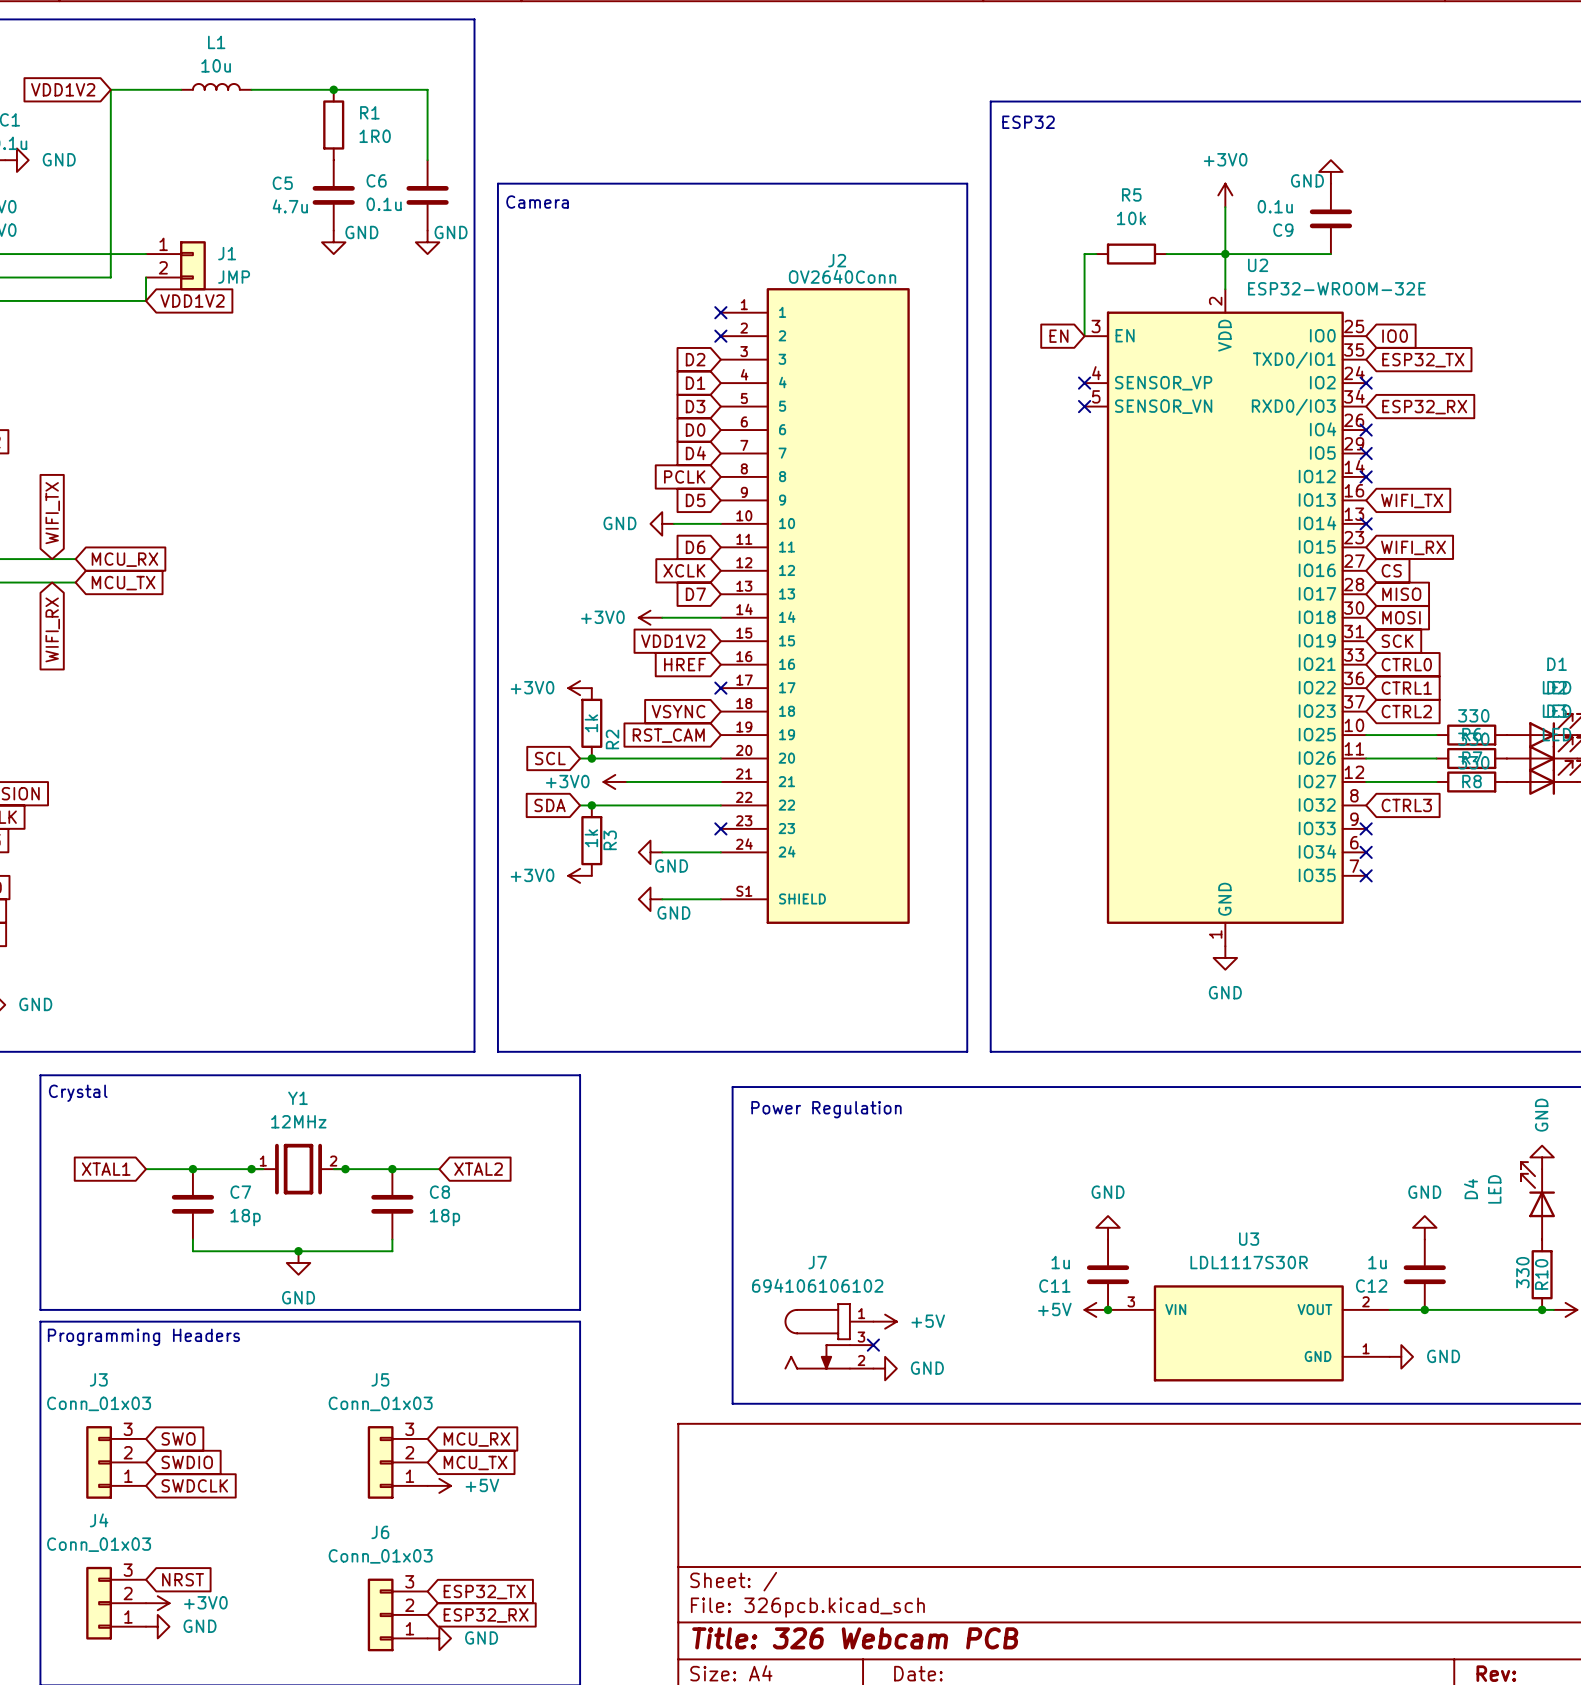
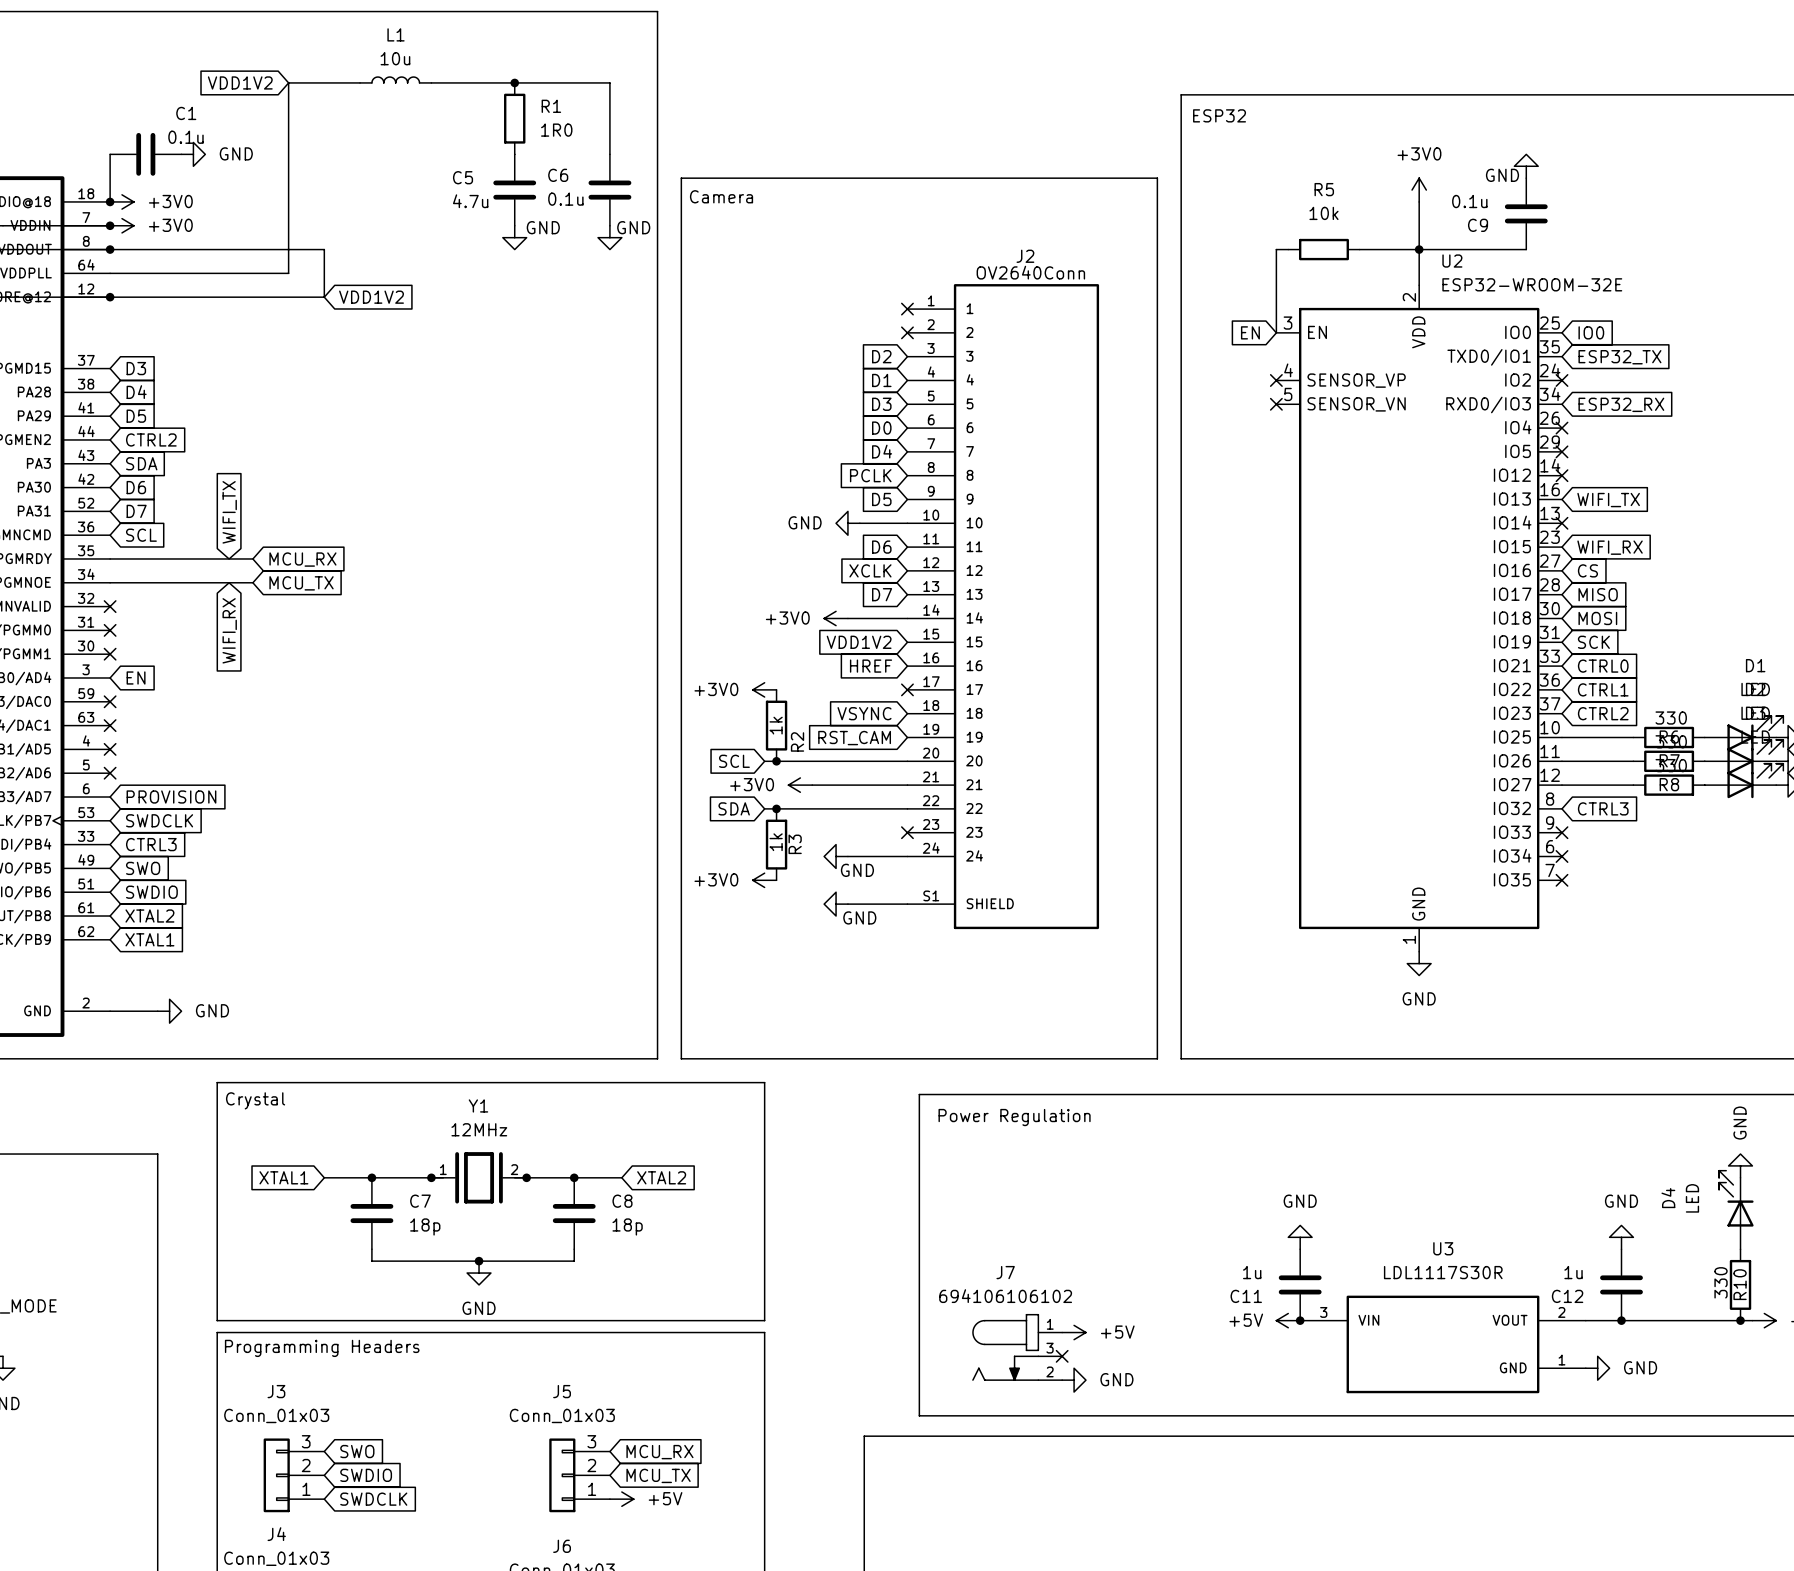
wire: none -> (324, 249) (324, 273)
J1: JMP (175, 265) -> none

